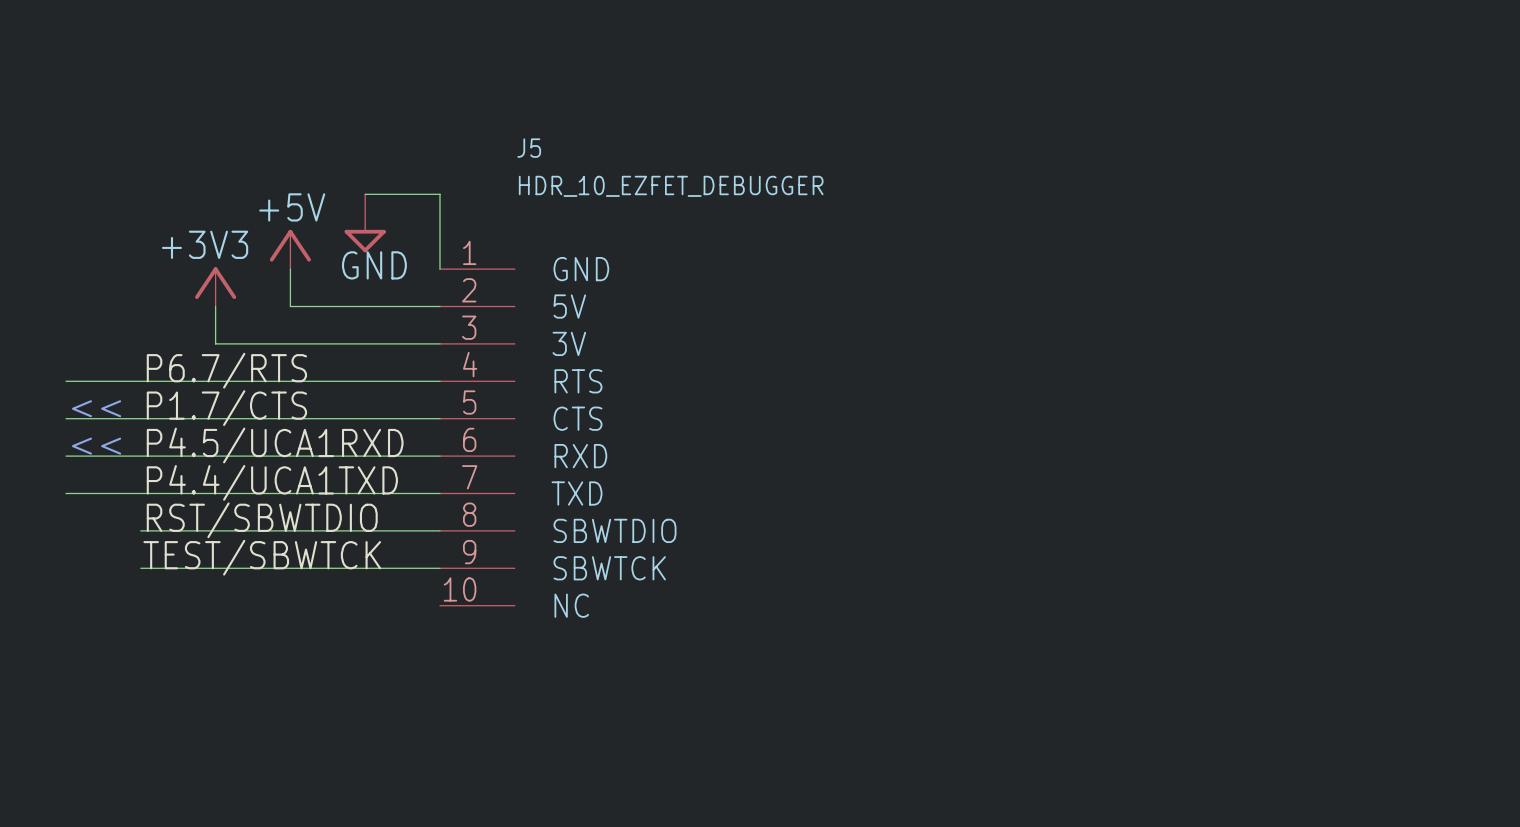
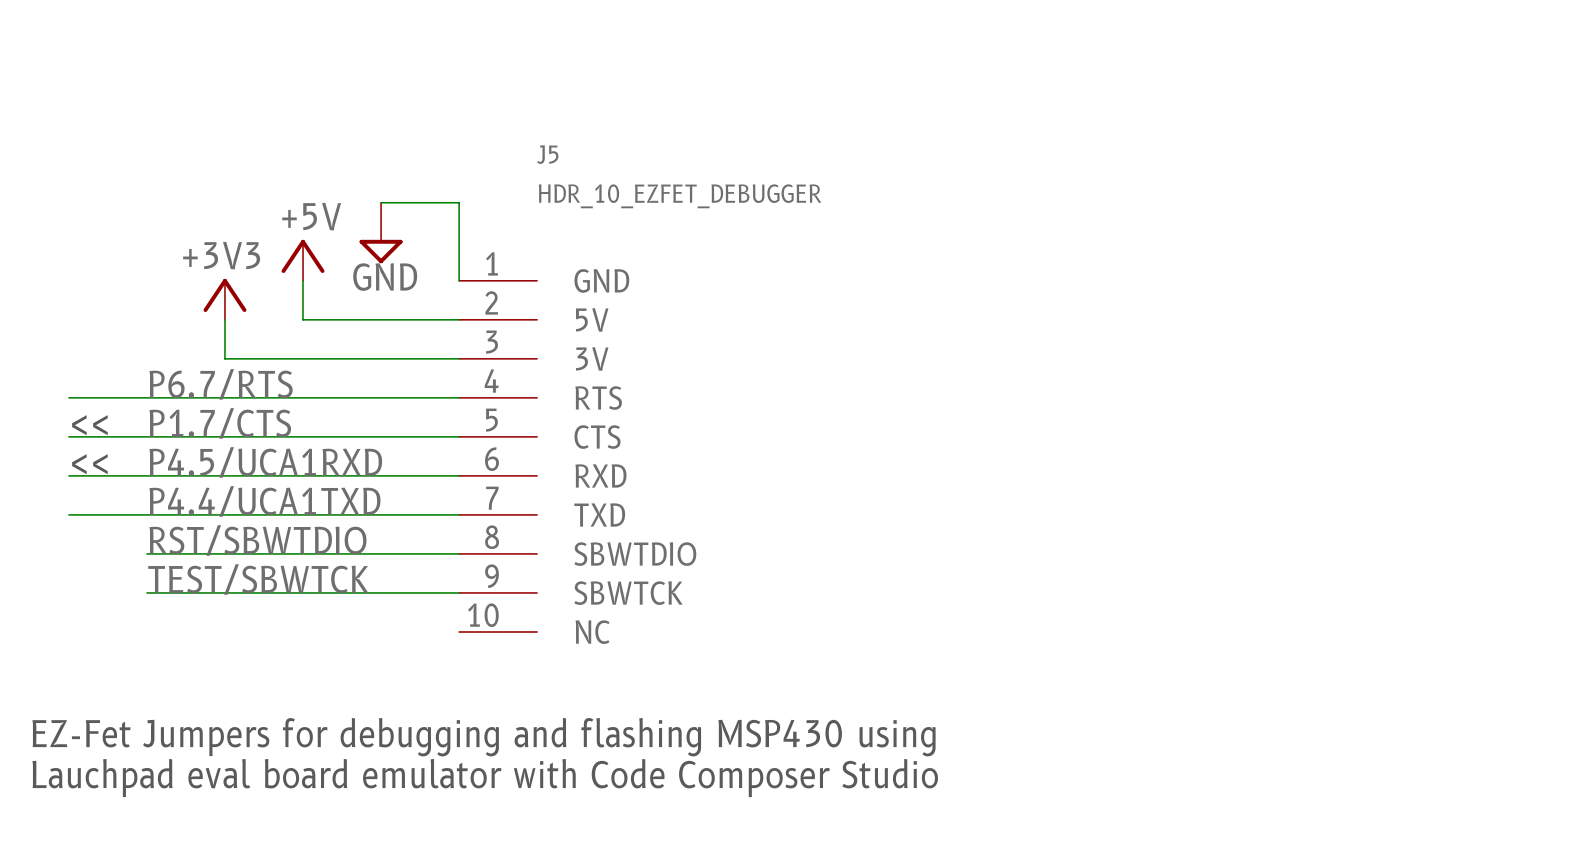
text: none -> EZ-Fet Jumpers for debugging and flashing MSP430 using (484, 737)
text: none -> Lauchpad eval board emulator with Code Composer Studio (485, 778)

